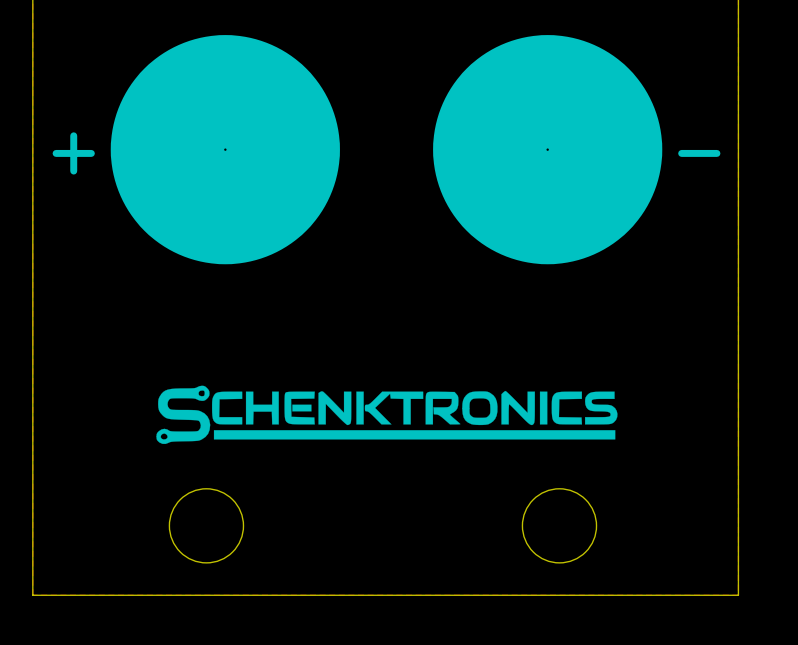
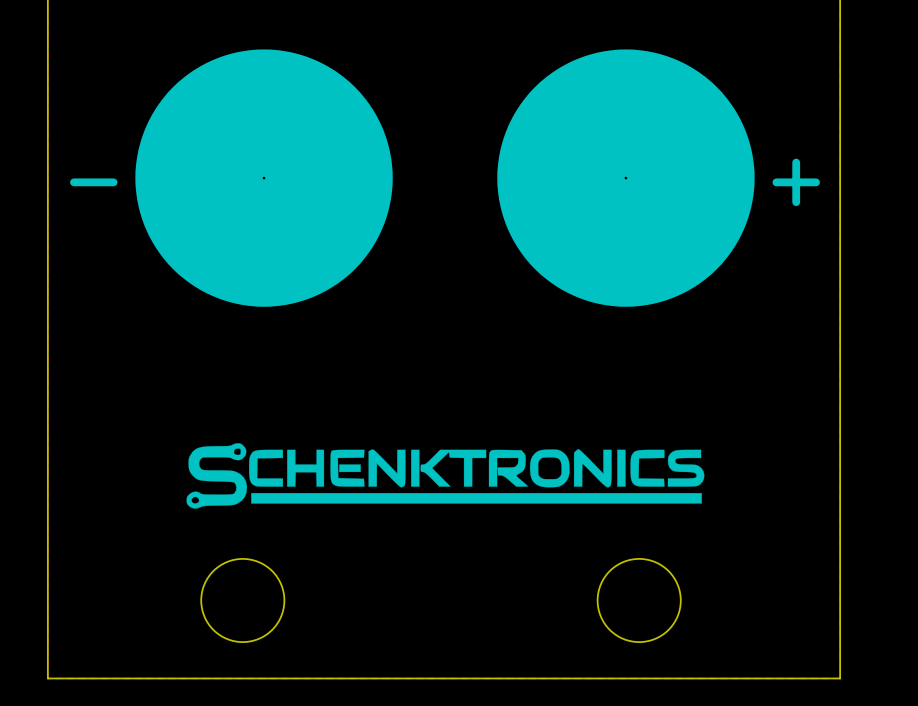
text: + (73, 153) -> - (93, 182)
text: - (699, 153) -> + (796, 182)

